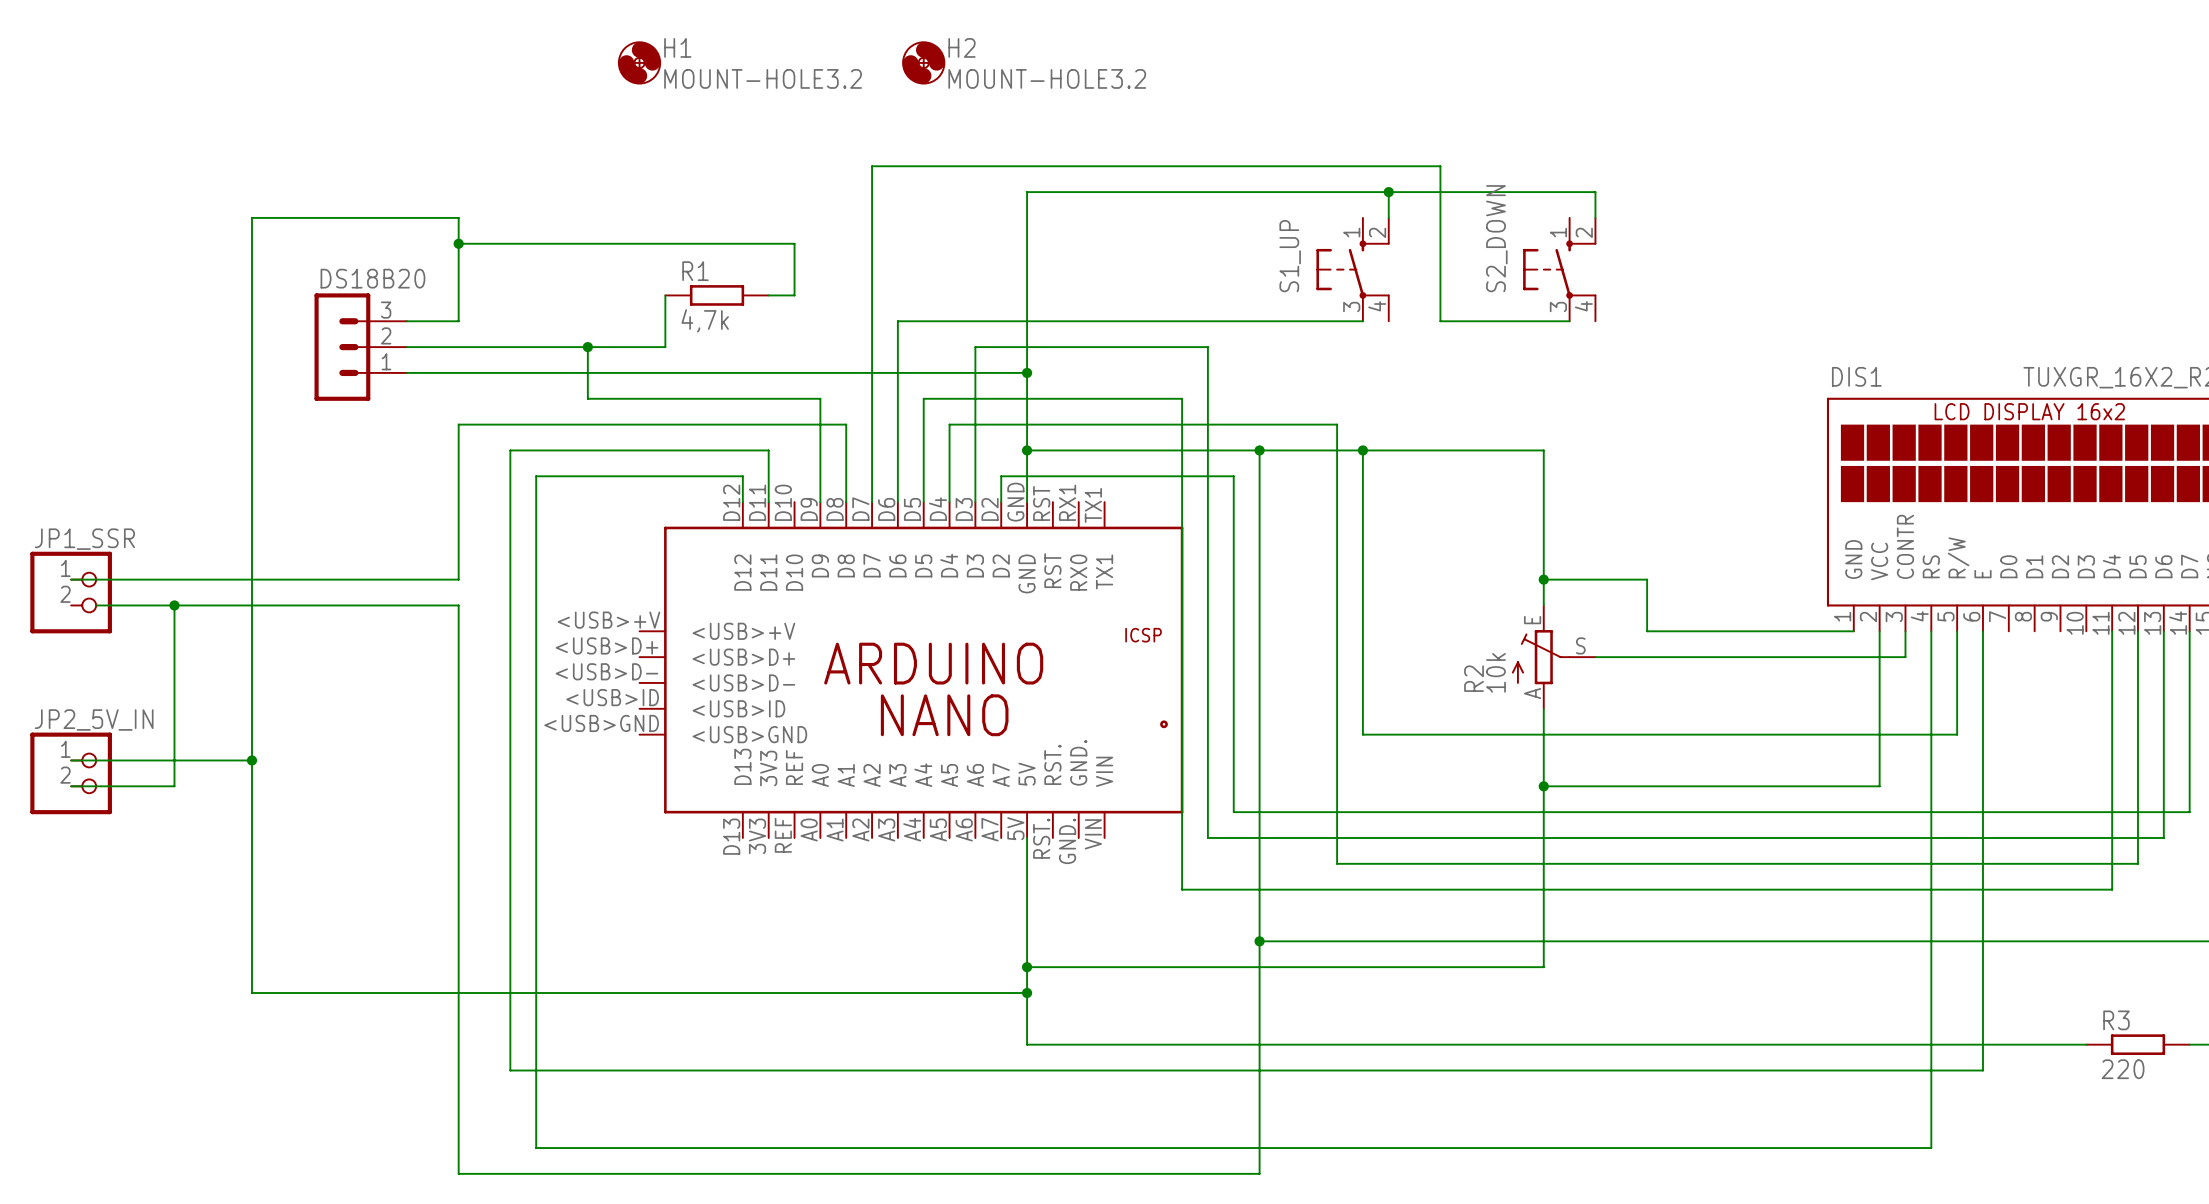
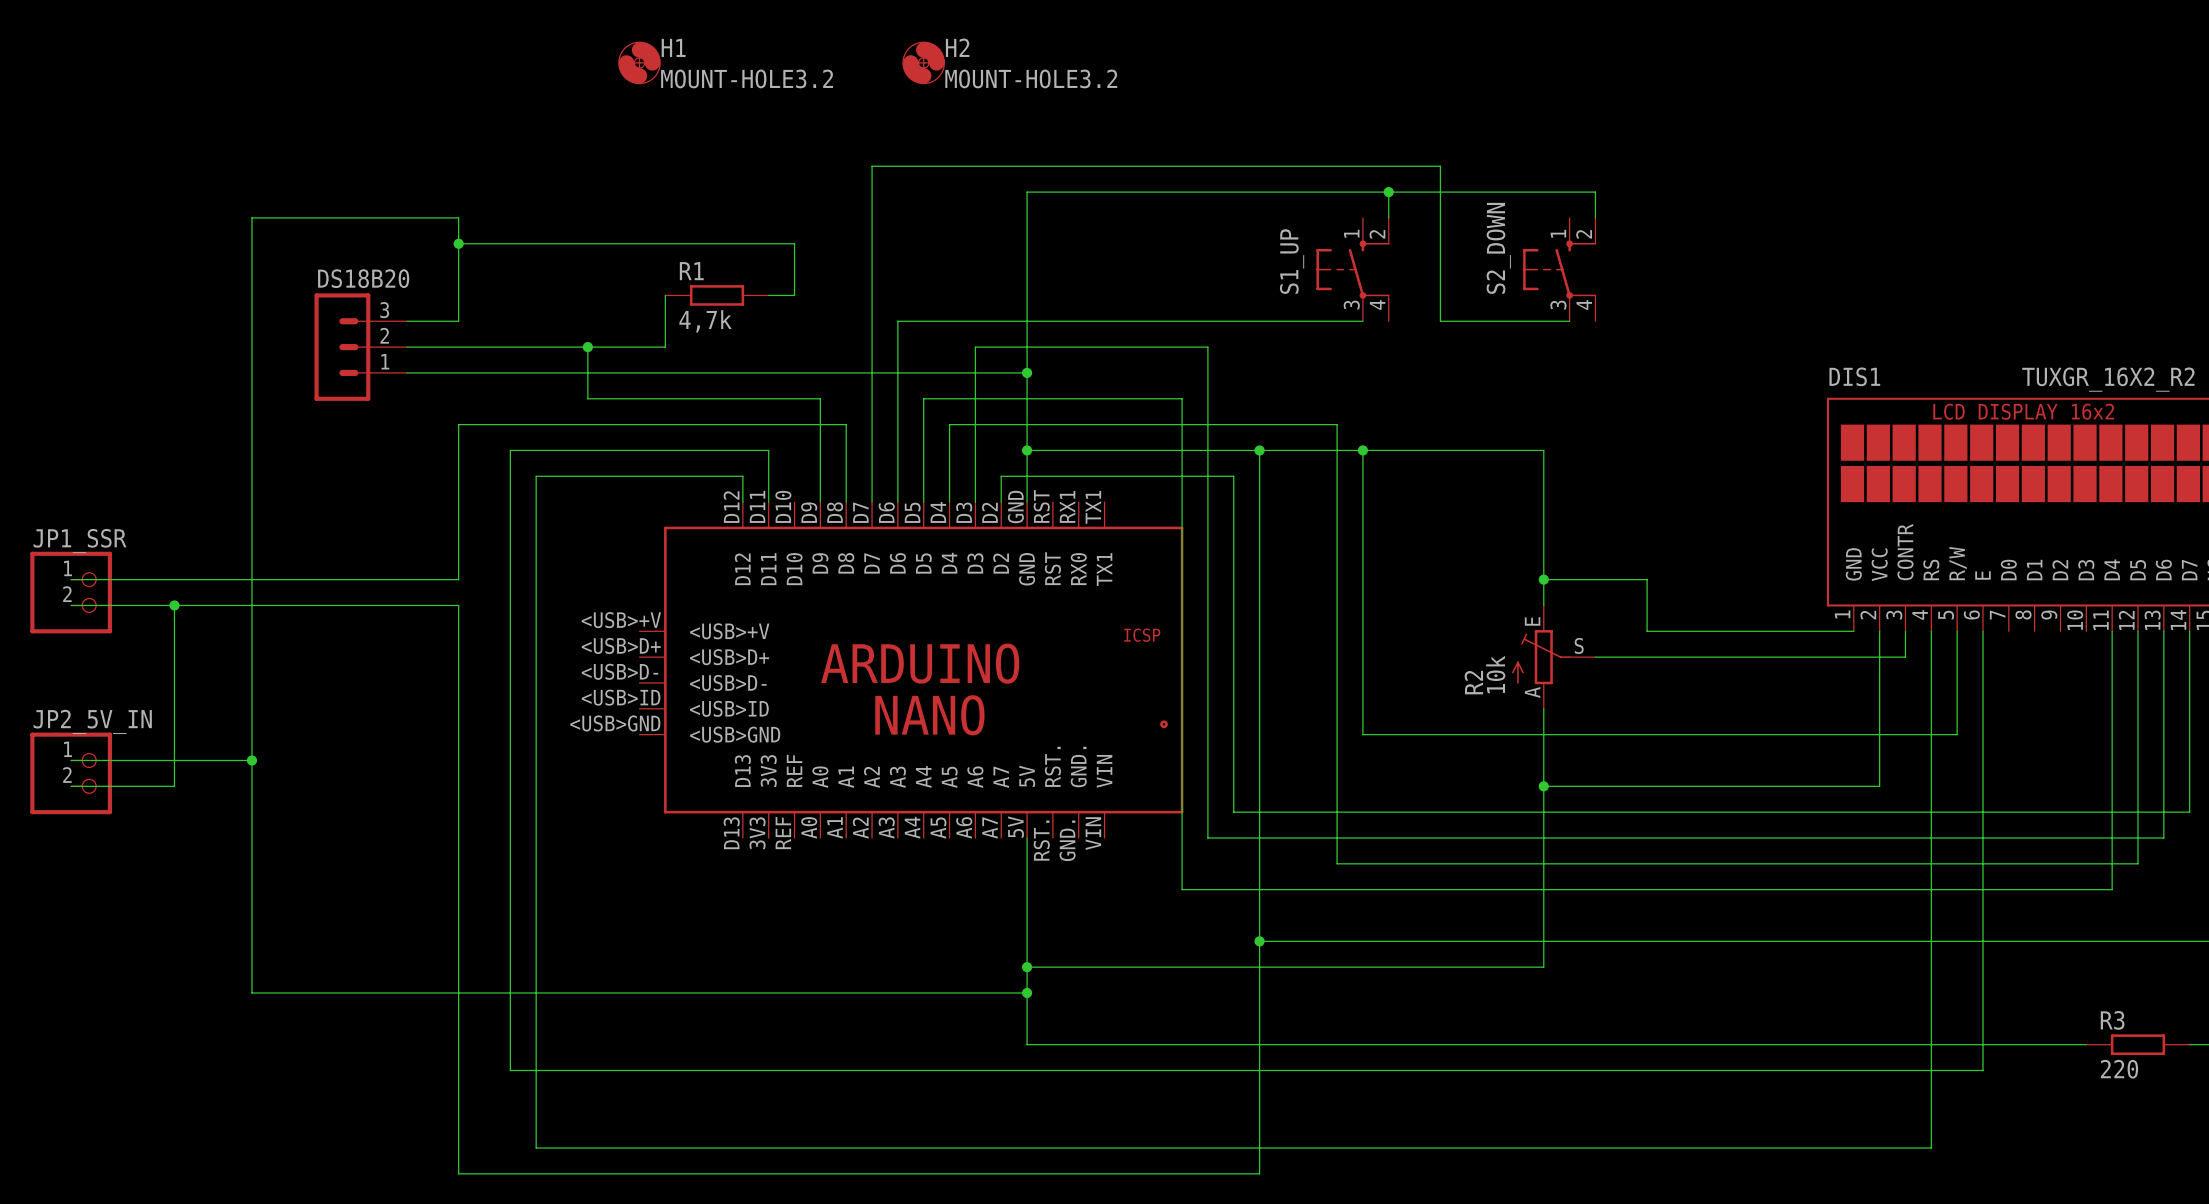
wire: none -> (71, 605) (96, 605)

